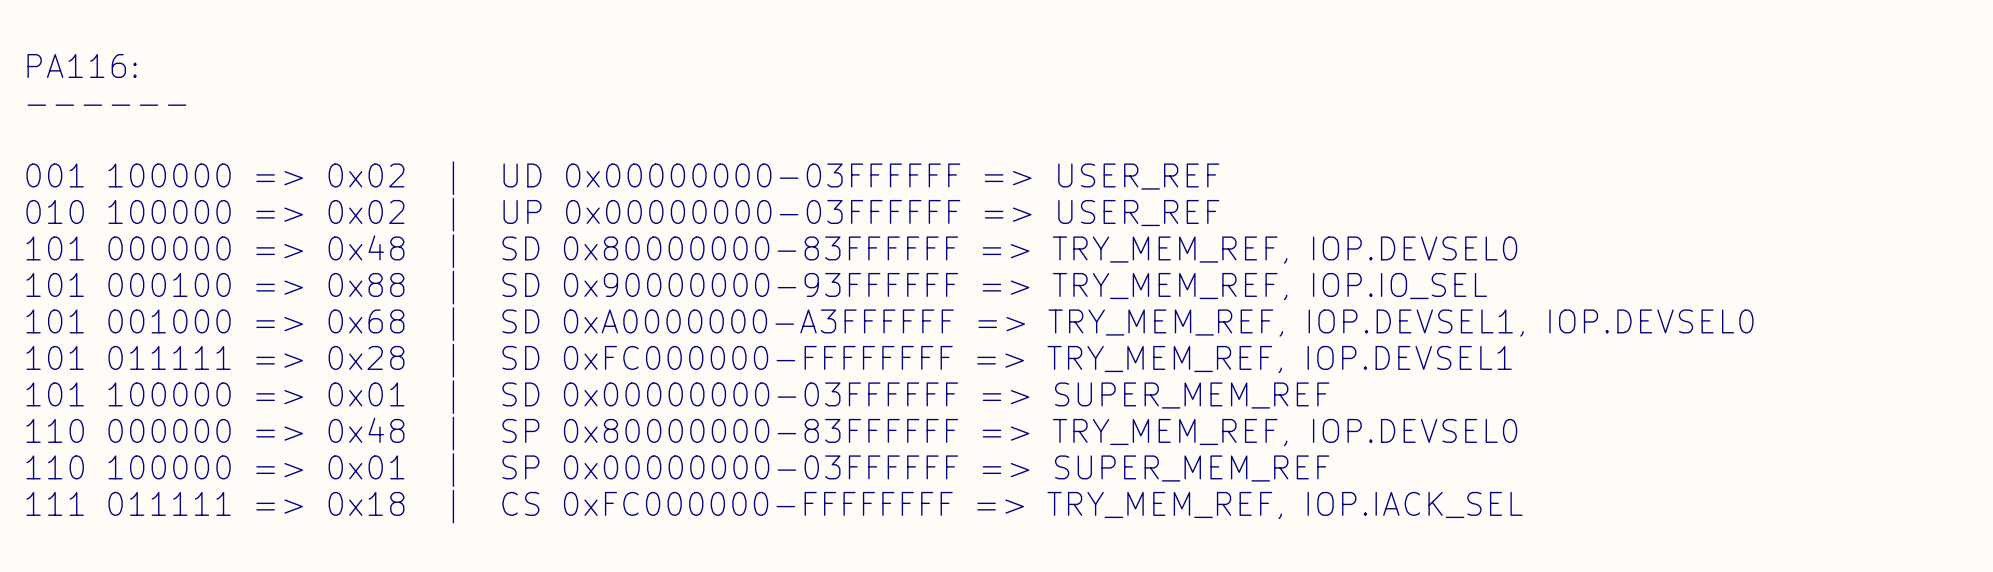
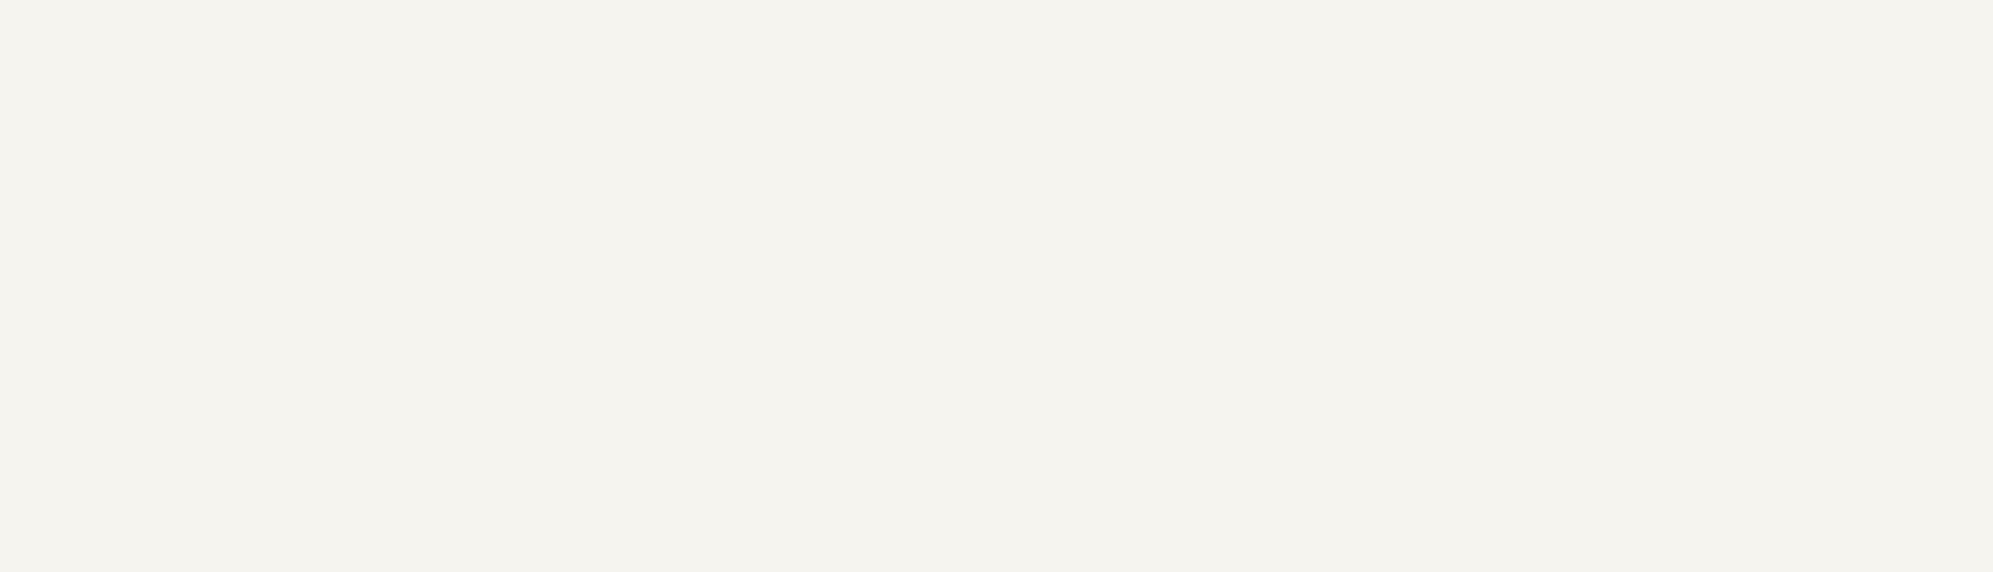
text: PA116: (82, 65) -> none
text: ------ (106, 105) -> none
text: 001 100000 => 0x02 | UD 0x00000000-03FFFFFF => USER_REF (622, 178) -> none
text: 010 100000 => 0x02 | UP 0x00000000-03FFFFFF => USER_REF (622, 214) -> none
text: 101 000000 => 0x48 | SD 0x80000000-83FFFFFF => TRY_MEM_REF, IOP.DEVSEL0 (771, 251) -> none
text: 101 000100 => 0x88 | SD 0x90000000-93FFFFFF => TRY_MEM_REF, IOP.IO_SEL (756, 287) -> none
text: 101 001000 => 0x68 | SD 0xA0000000-A3FFFFFF => TRY_MEM_REF, IOP.DEVSEL1, IOP.DEVSEL0 (889, 324) -> none
text: 101 011111 => 0x28 | SD 0xFC000000-FFFFFFFF => TRY_MEM_REF, IOP.DEVSEL1 (769, 360) -> none
text: 101 100000 => 0x01 | SD 0x00000000-03FFFFFF => SUPER_MEM_REF (677, 397) -> none
text: 110 000000 => 0x48 | SP 0x80000000-83FFFFFF => TRY_MEM_REF, IOP.DEVSEL0 (771, 433) -> none
text: 110 100000 => 0x01 | SP 0x00000000-03FFFFFF => SUPER_MEM_REF (677, 470) -> none
text: 111 011111 => 0x18 | CS 0xFC000000-FFFFFFFF => TRY_MEM_REF, IOP.IACK_SEL (774, 506) -> none

